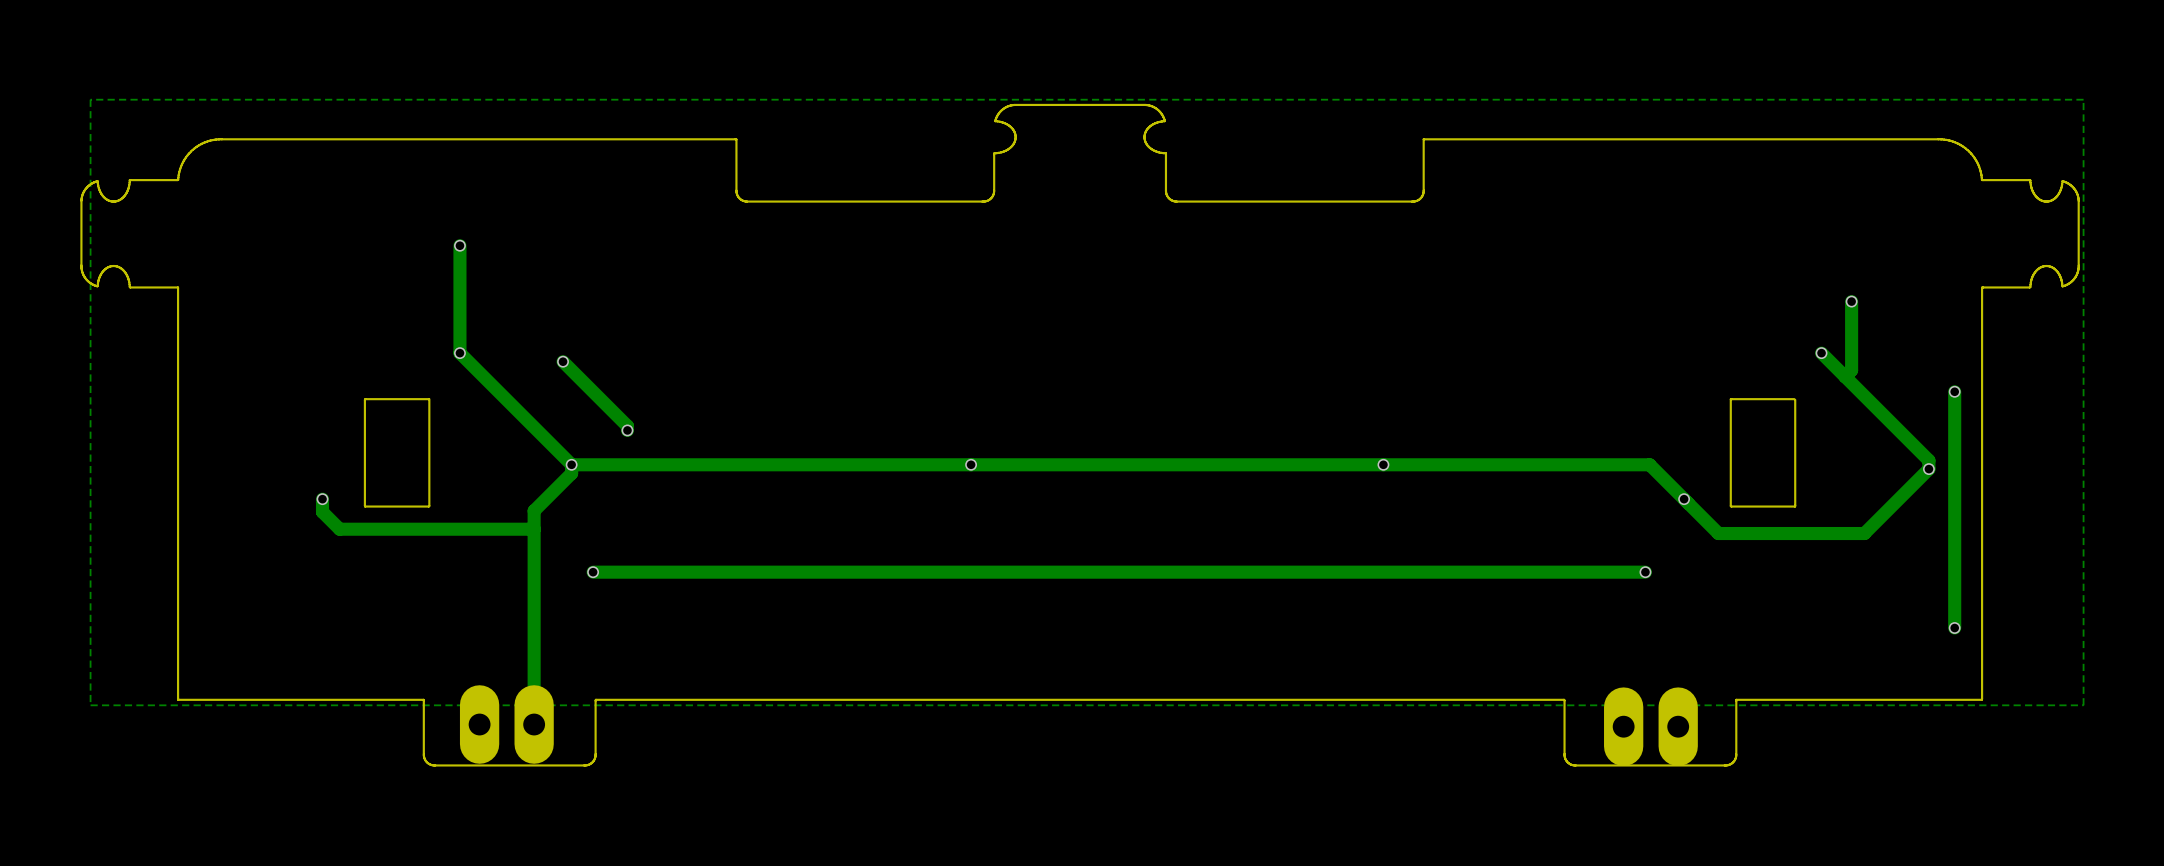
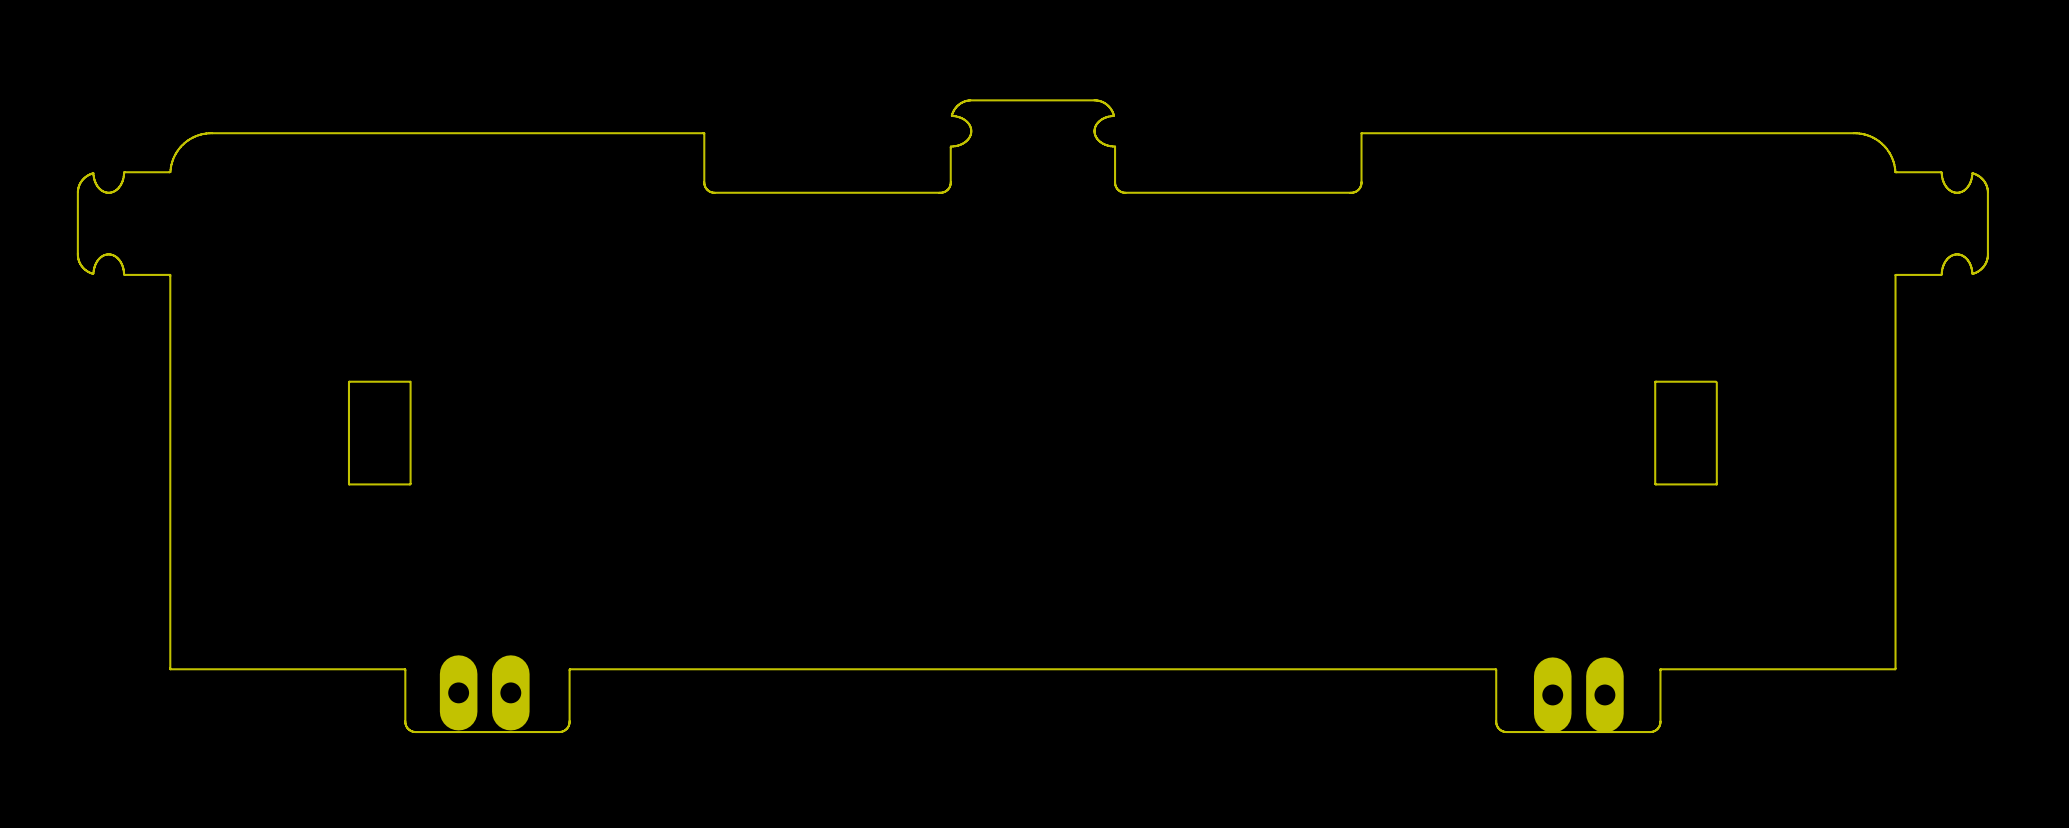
zone outline: (2083, 99) (90, 99) (90, 705) (2083, 705) (2083, 99) -> none
track: (459, 245) (459, 353) (571, 464) -> none
via: (459, 245) -> none
track: (1851, 301) (1851, 370) (1845, 376) -> none
via: (1851, 301) -> none
via: (459, 353) -> none
track: (1821, 353) (1928, 460) (1928, 469) (1864, 533) (1718, 533) (1649, 464) (571, 464) -> none
via: (1821, 353) -> none
track: (563, 361) (627, 426) (627, 430) -> none
via: (563, 361) -> none
track: (1954, 391) (1954, 628) -> none
via: (1954, 391) -> none
via: (627, 430) -> none
track: (571, 464) (571, 473) (534, 510) (534, 724) -> none
via: (571, 464) -> none
via: (971, 464) -> none
via: (1383, 464) -> none
via: (1928, 469) -> none
track: (322, 499) (322, 512) (339, 529) (534, 529) -> none
via: (322, 499) -> none
via: (1684, 499) -> none
via: (593, 572) -> none
track: (1645, 572) (593, 572) -> none
via: (1645, 572) -> none
via: (1954, 628) -> none

